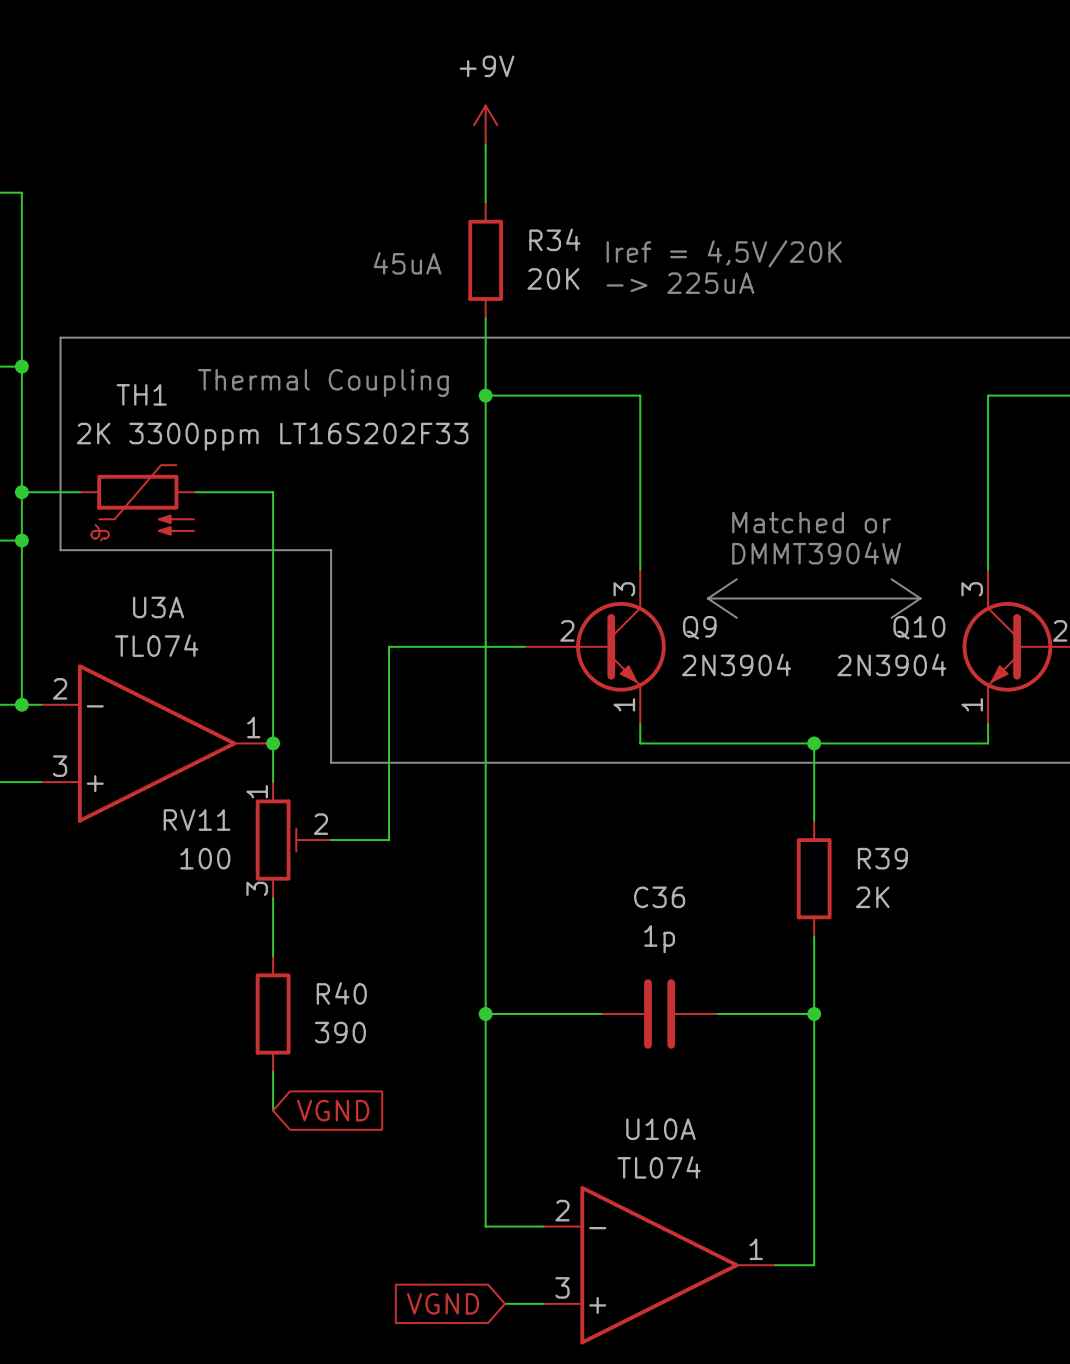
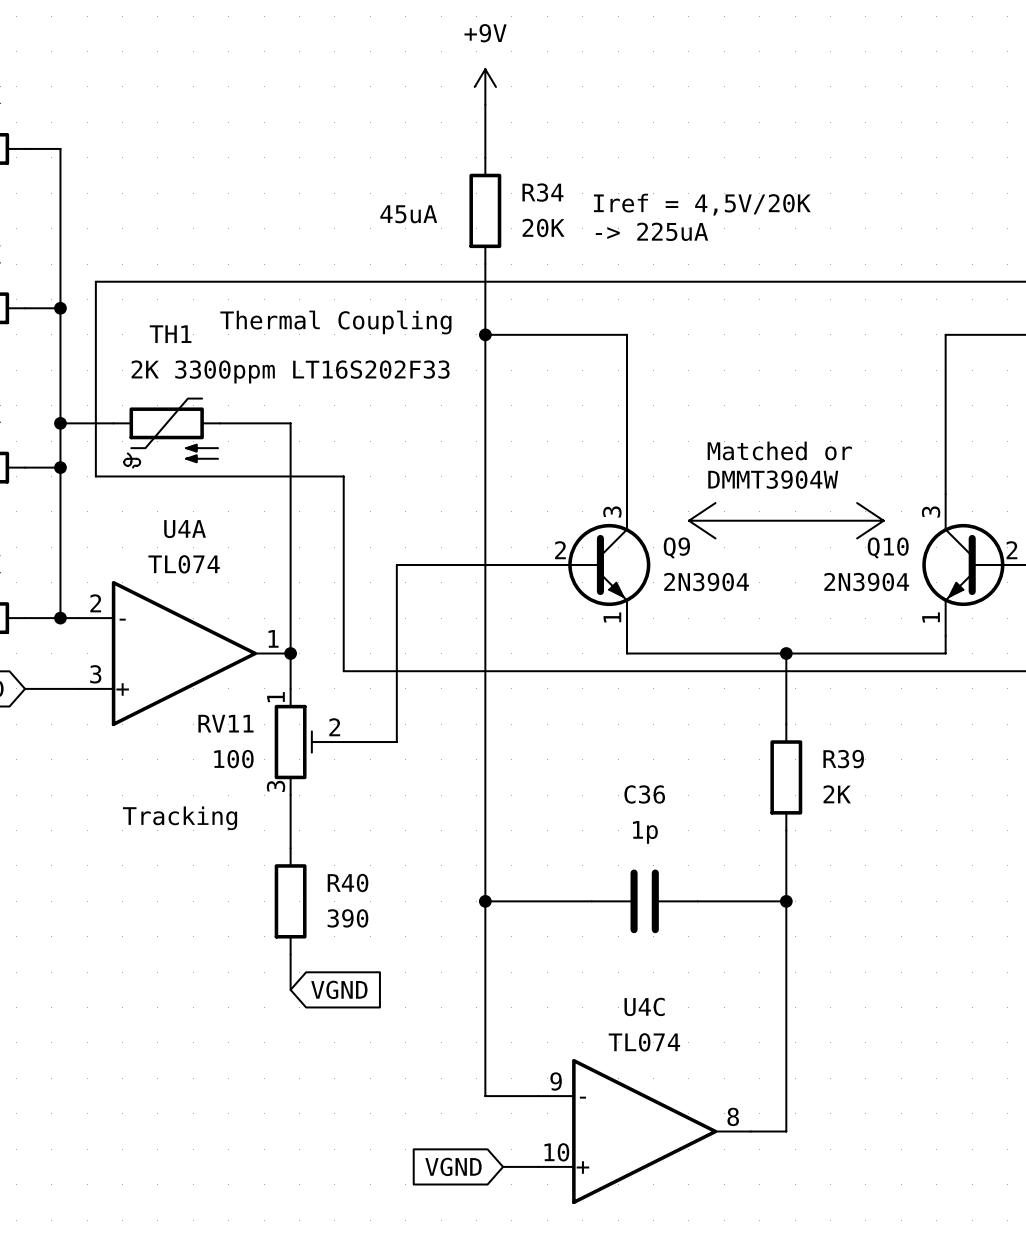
U3A name: U3A (158, 607) -> U4A (185, 529)
text: none -> Tracking (180, 818)
U10A name: U10A (660, 1129) -> U4C (644, 1006)
U10A pin number: 2 (562, 1210) -> 9 (556, 1081)
U10A pin number: 1 (756, 1249) -> 8 (733, 1116)
U10A pin number: 3 (562, 1287) -> 10 (556, 1152)

